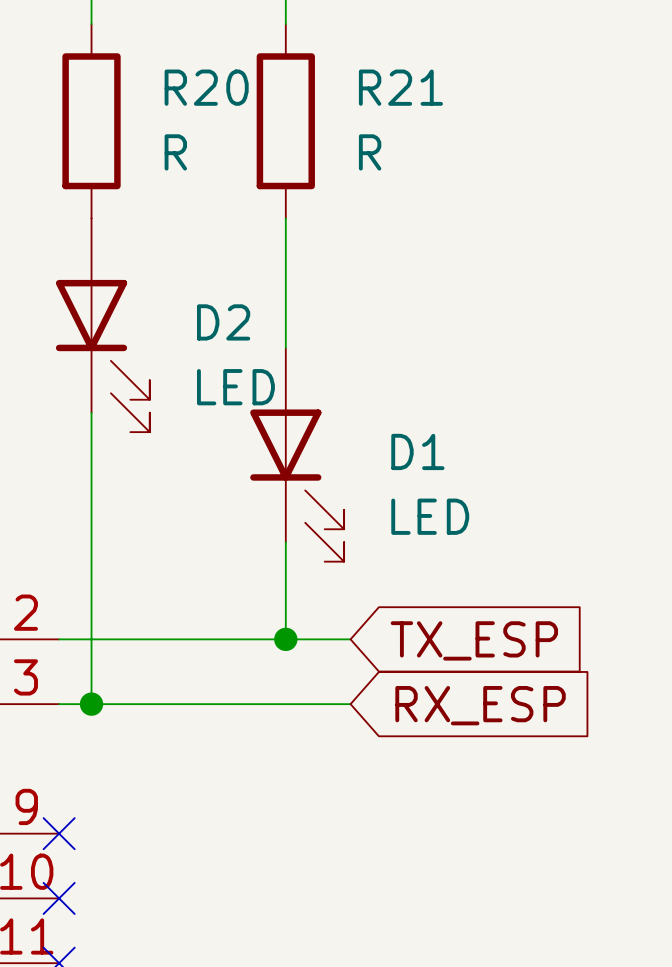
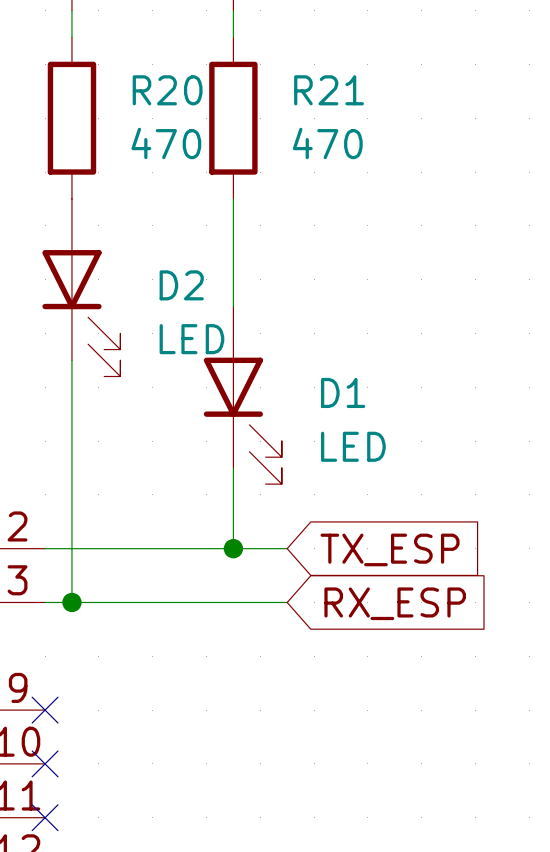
R20 value: R (175, 152) -> 470 (166, 143)
R21 value: R (370, 152) -> 470 (327, 143)

